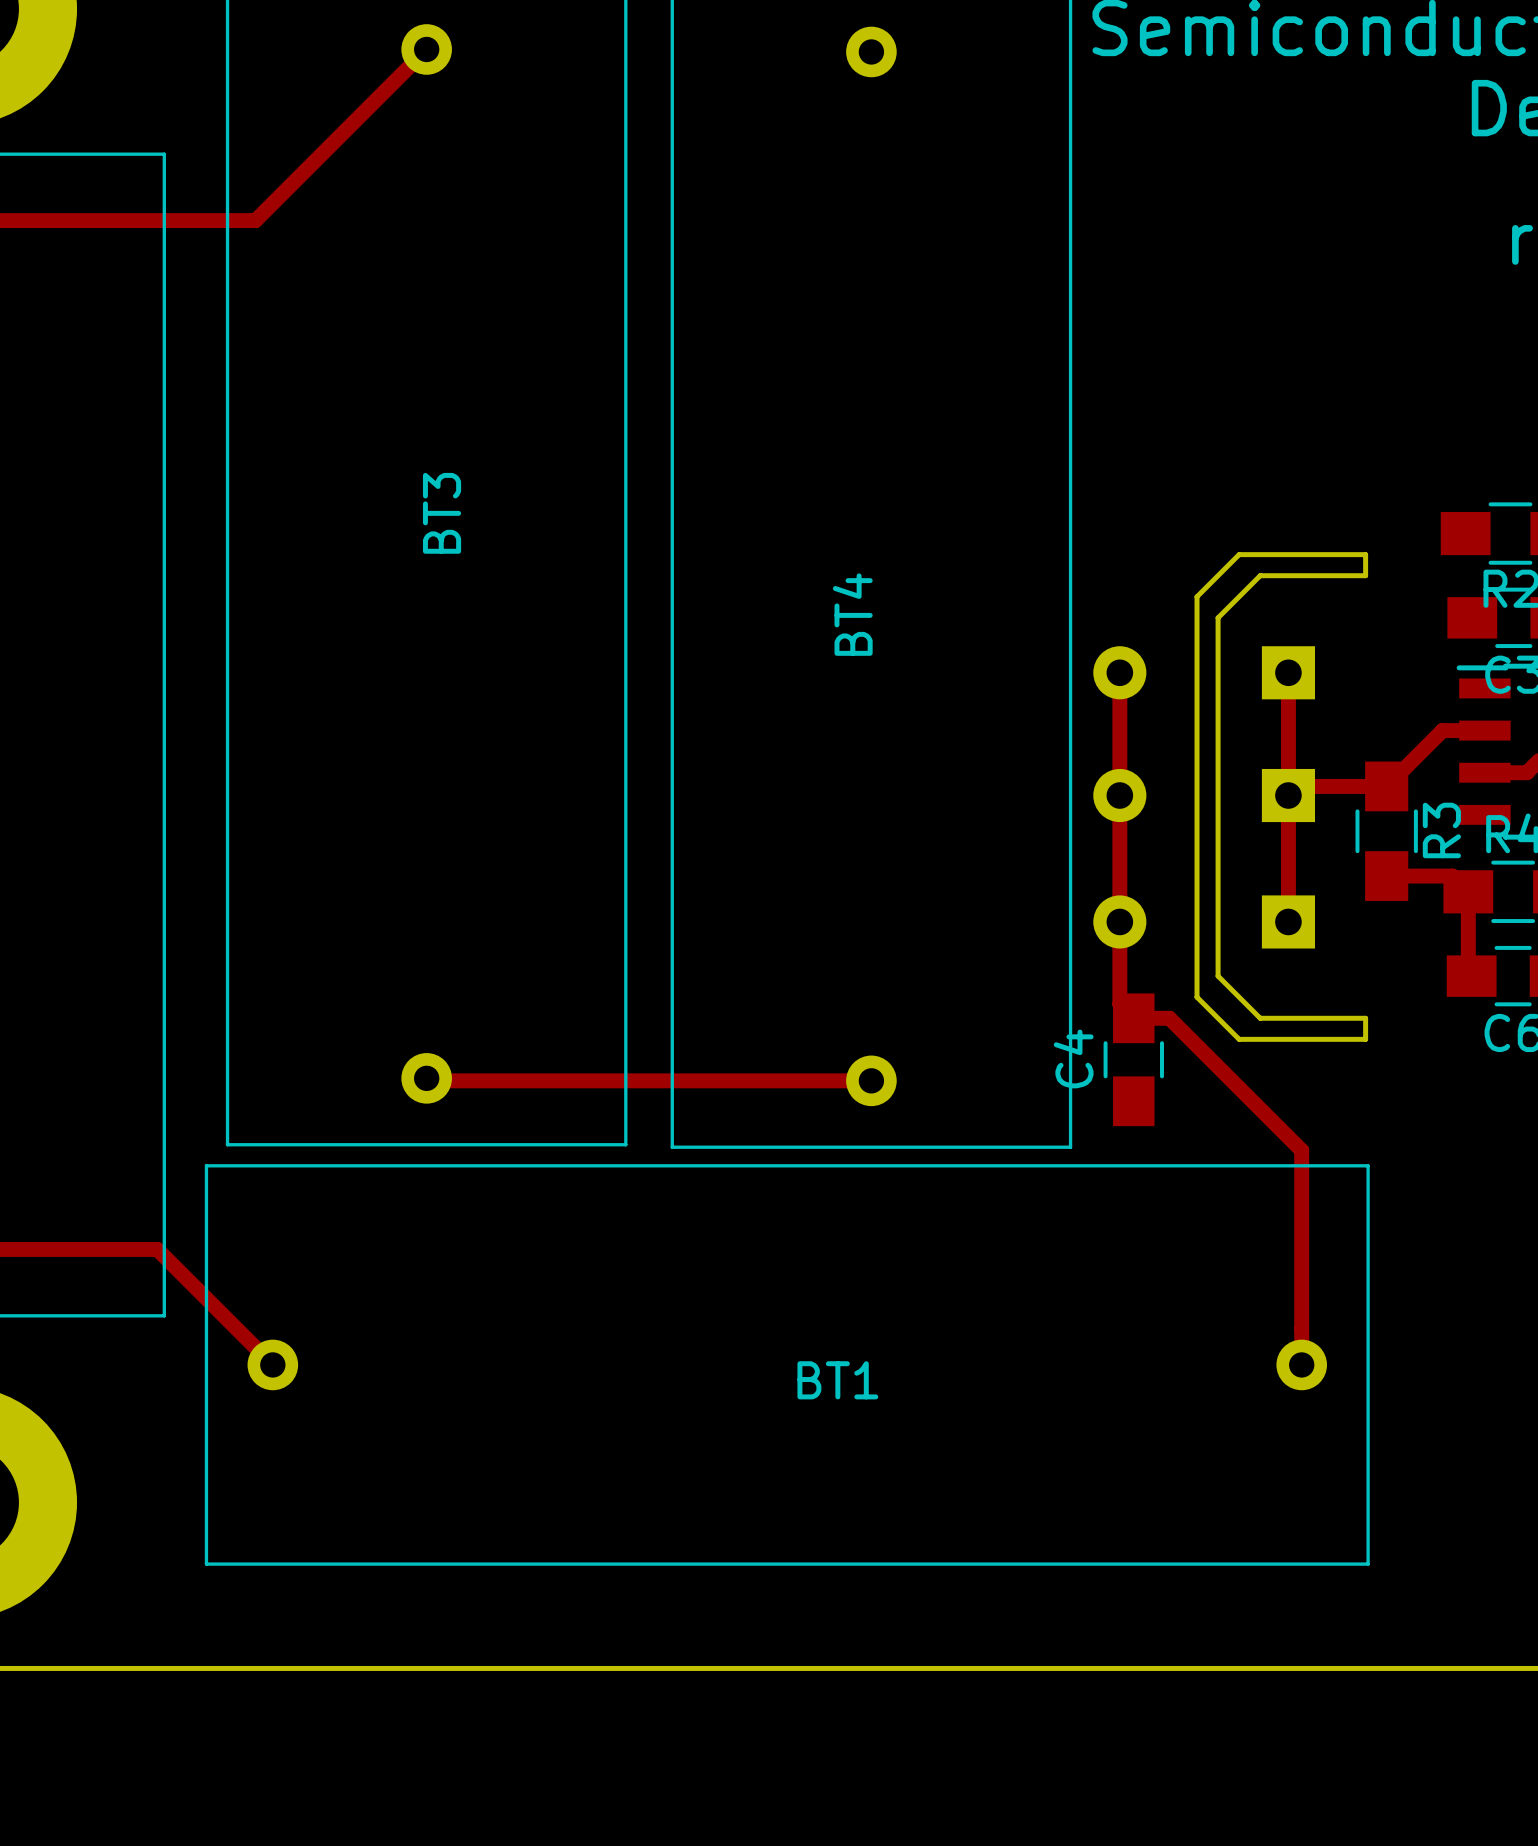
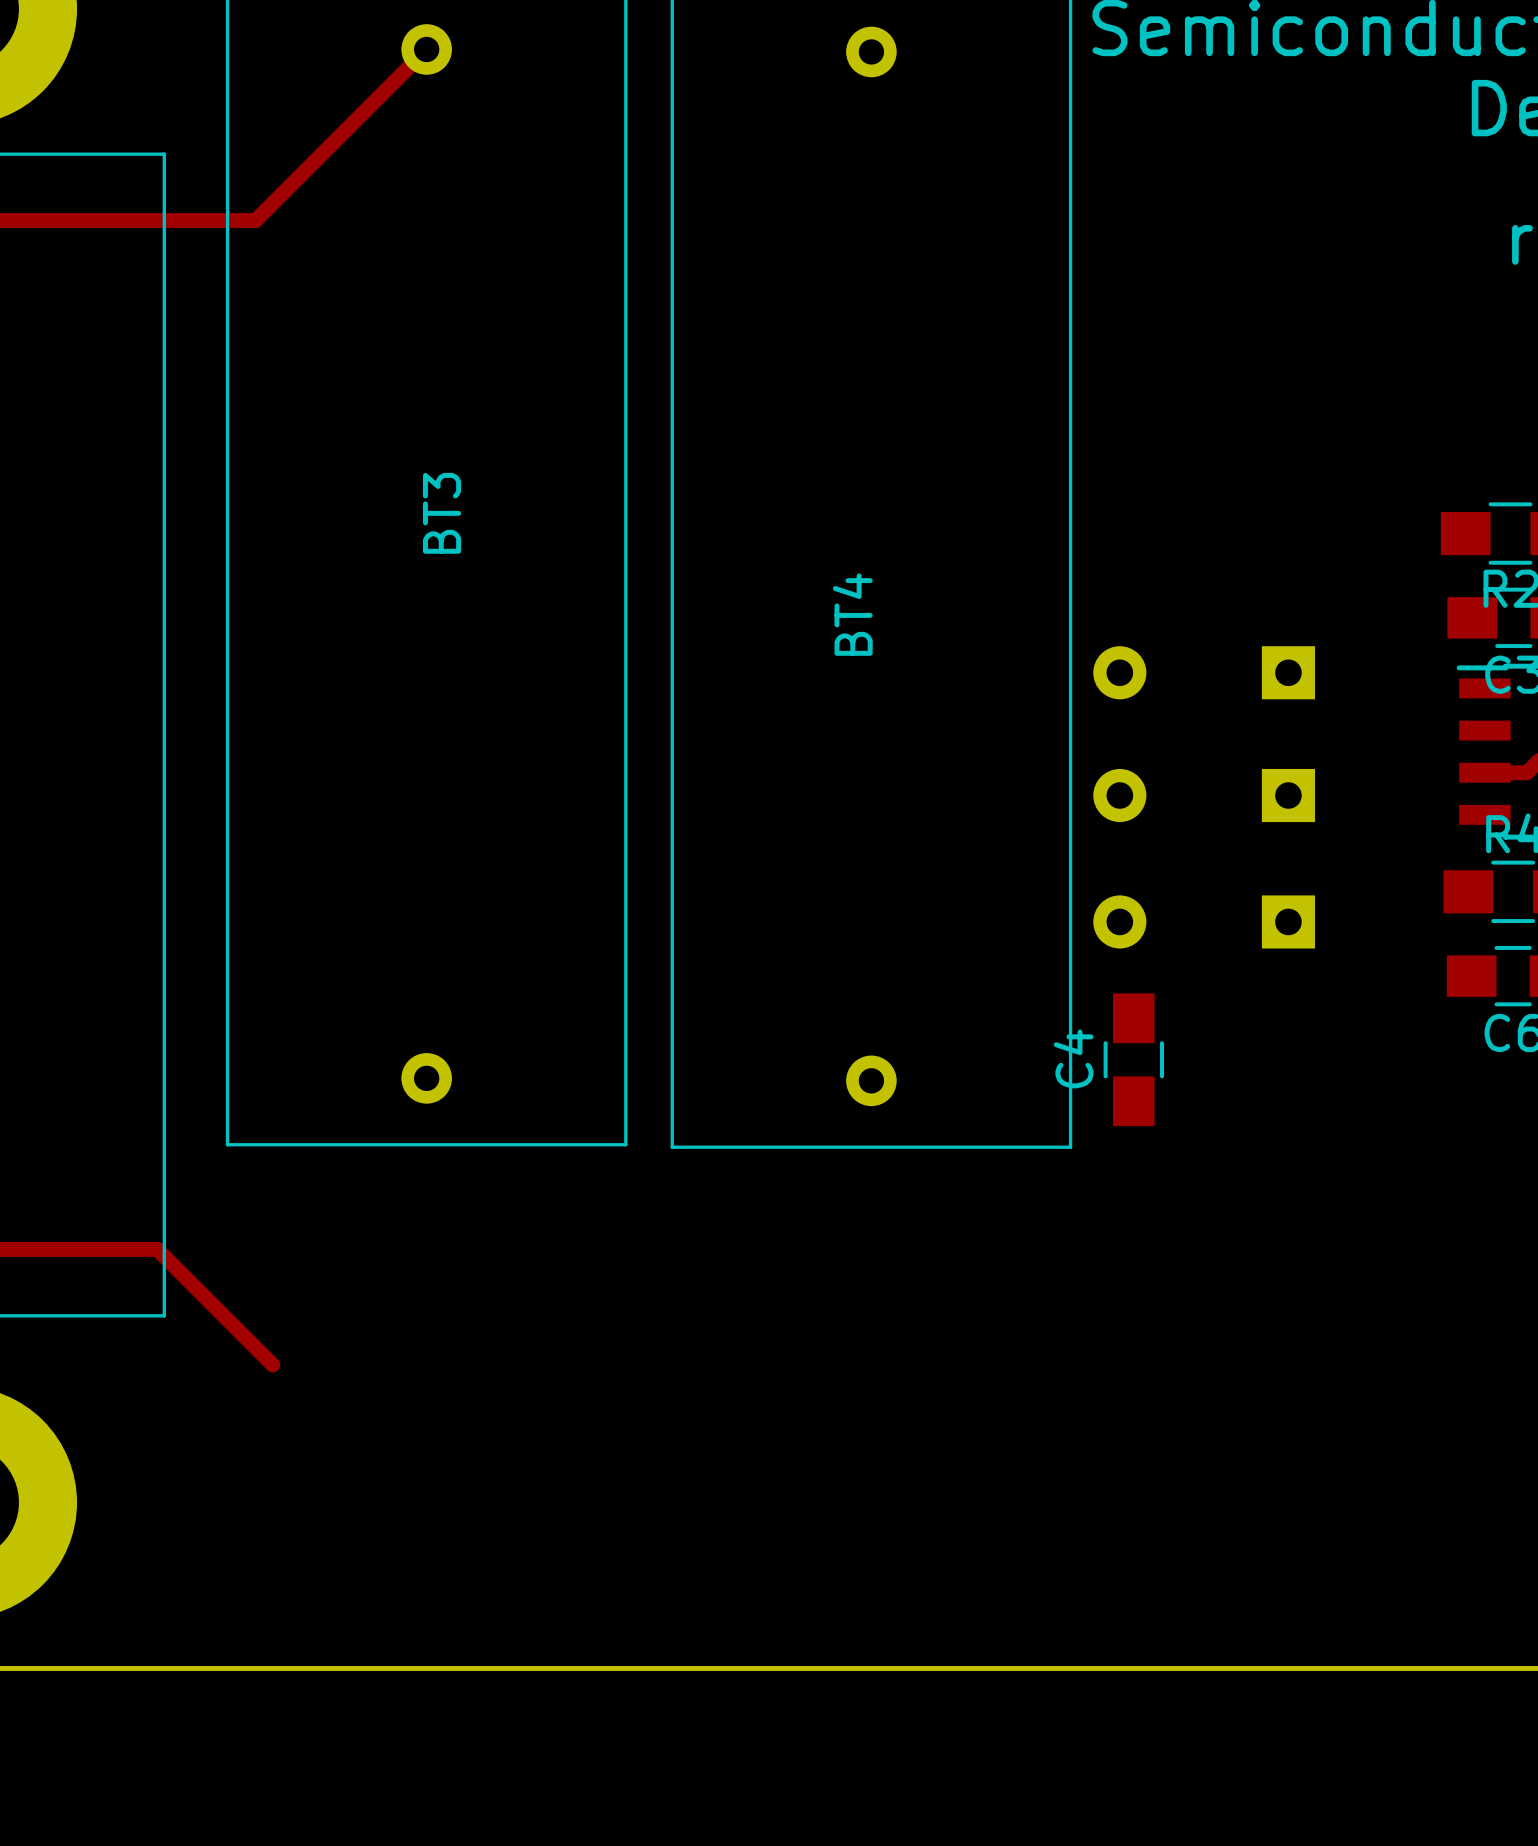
board edge: (1239, 554) (1365, 554) (1365, 575) (1260, 575) (1218, 617) (1218, 976) (1260, 1018) (1365, 1018) (1365, 1039) (1239, 1039) (1197, 997) (1197, 596) (1239, 554) -> none
top track: (1119, 672) (1119, 1004) (1133, 1018) (1169, 1018) (1301, 1150) (1301, 1364) -> none
top track: (1288, 672) (1288, 921) -> none
top track: (1484, 730) (1442, 730) (1386, 786) (1297, 786) (1288, 795) -> none
R3: (1386, 831) -> none
top track: (1386, 876) (1452, 876) (1468, 891) (1468, 972) (1471, 976) -> none
top track: (426, 1078) (429, 1080) (871, 1080) -> none
BT1: (787, 1364) -> none

